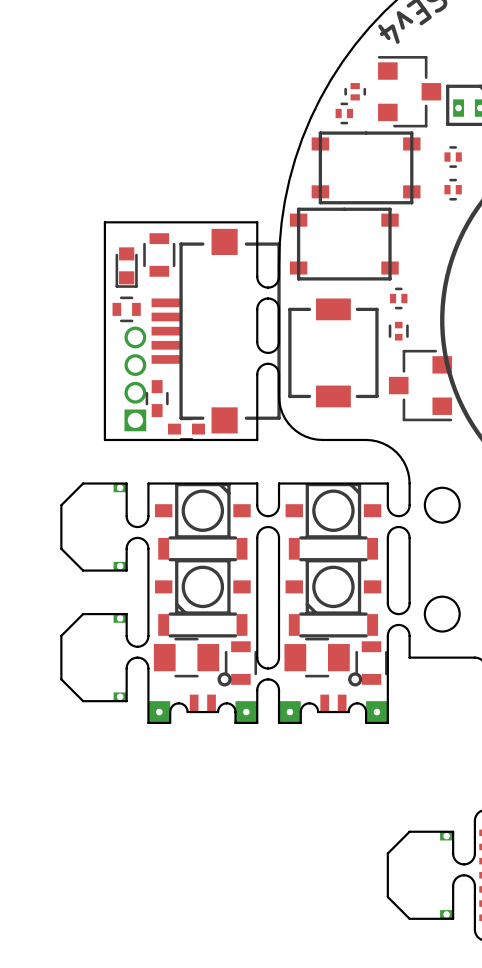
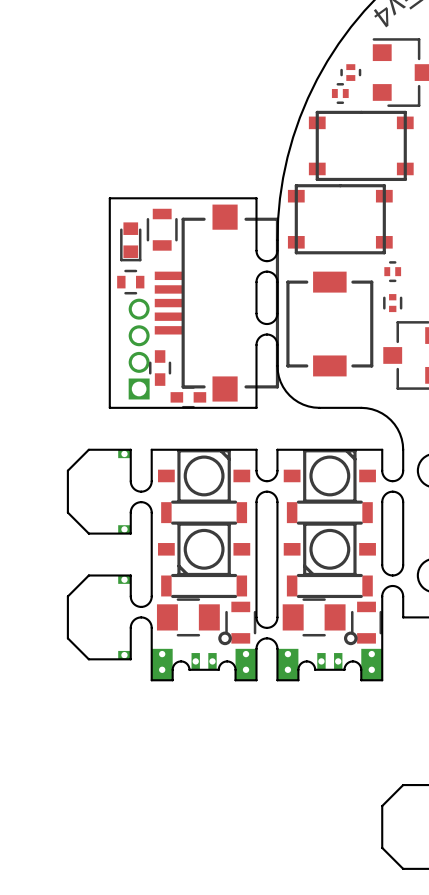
part footprint: [148, 672, 258, 723] -> [151, 631, 257, 681]
part footprint: [279, 672, 388, 723] -> [277, 631, 383, 681]

